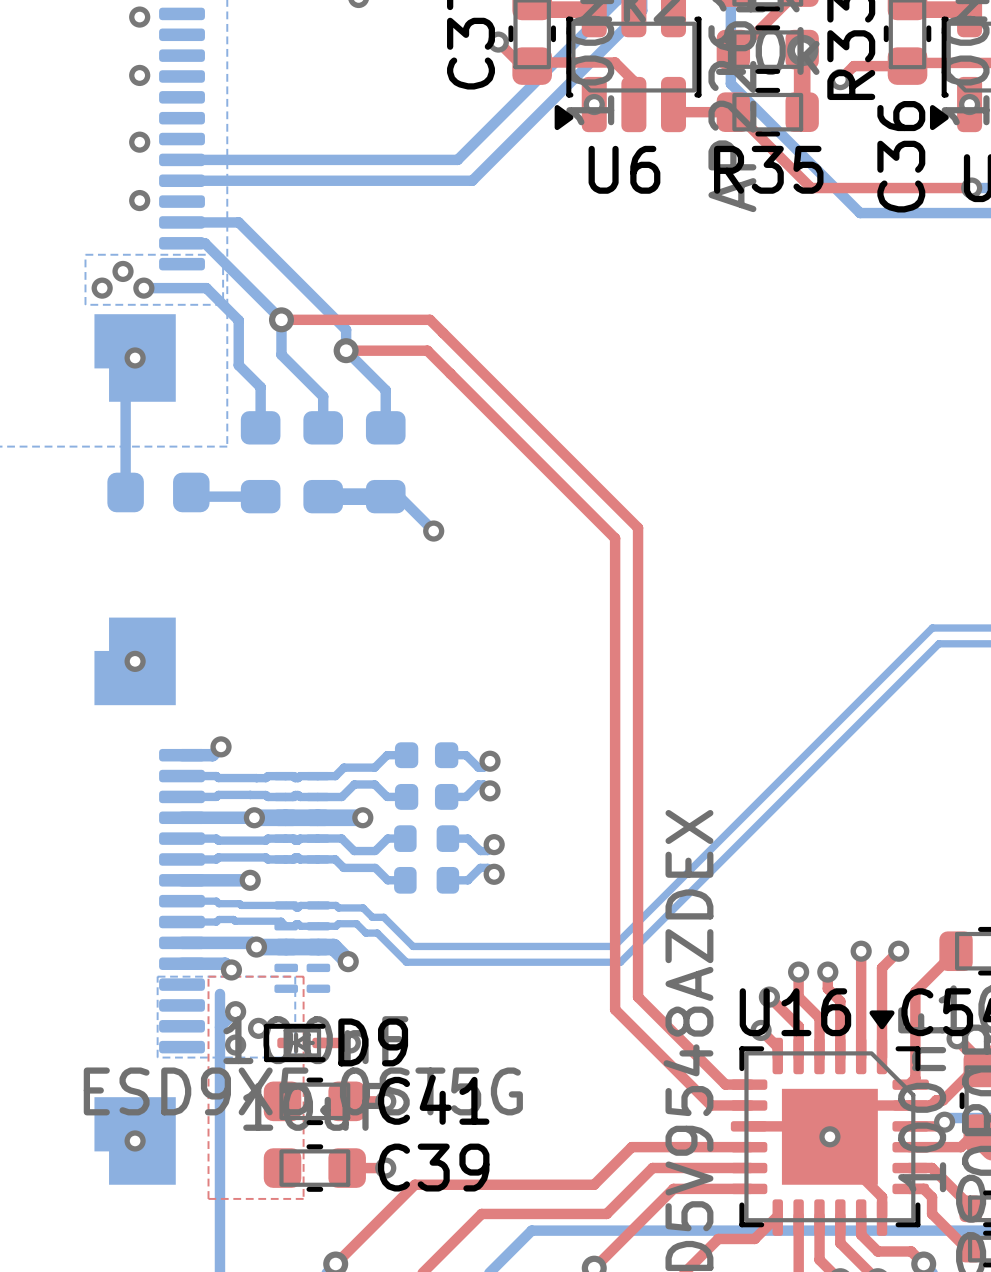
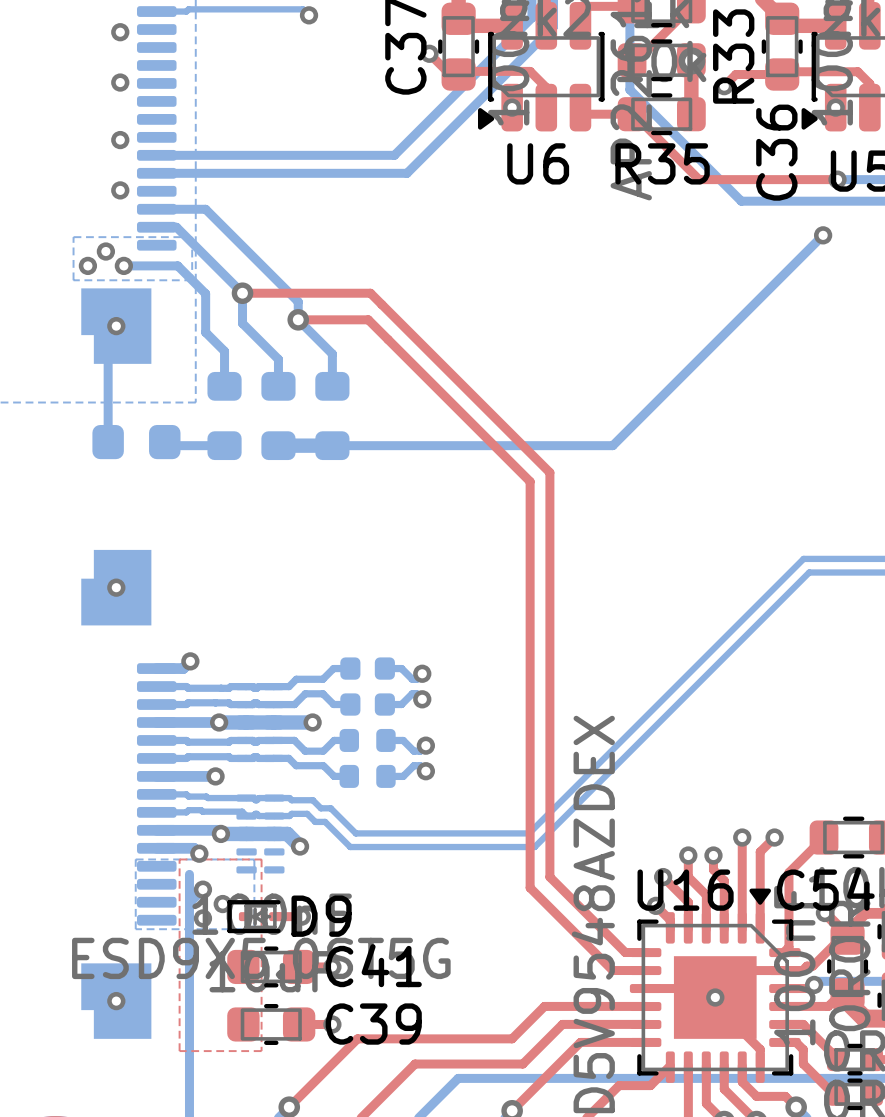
via: none -> (823, 235)
bottom track: (399, 496) (433, 531) -> (344, 445) (612, 445) (823, 235)
via: (433, 531) -> none

